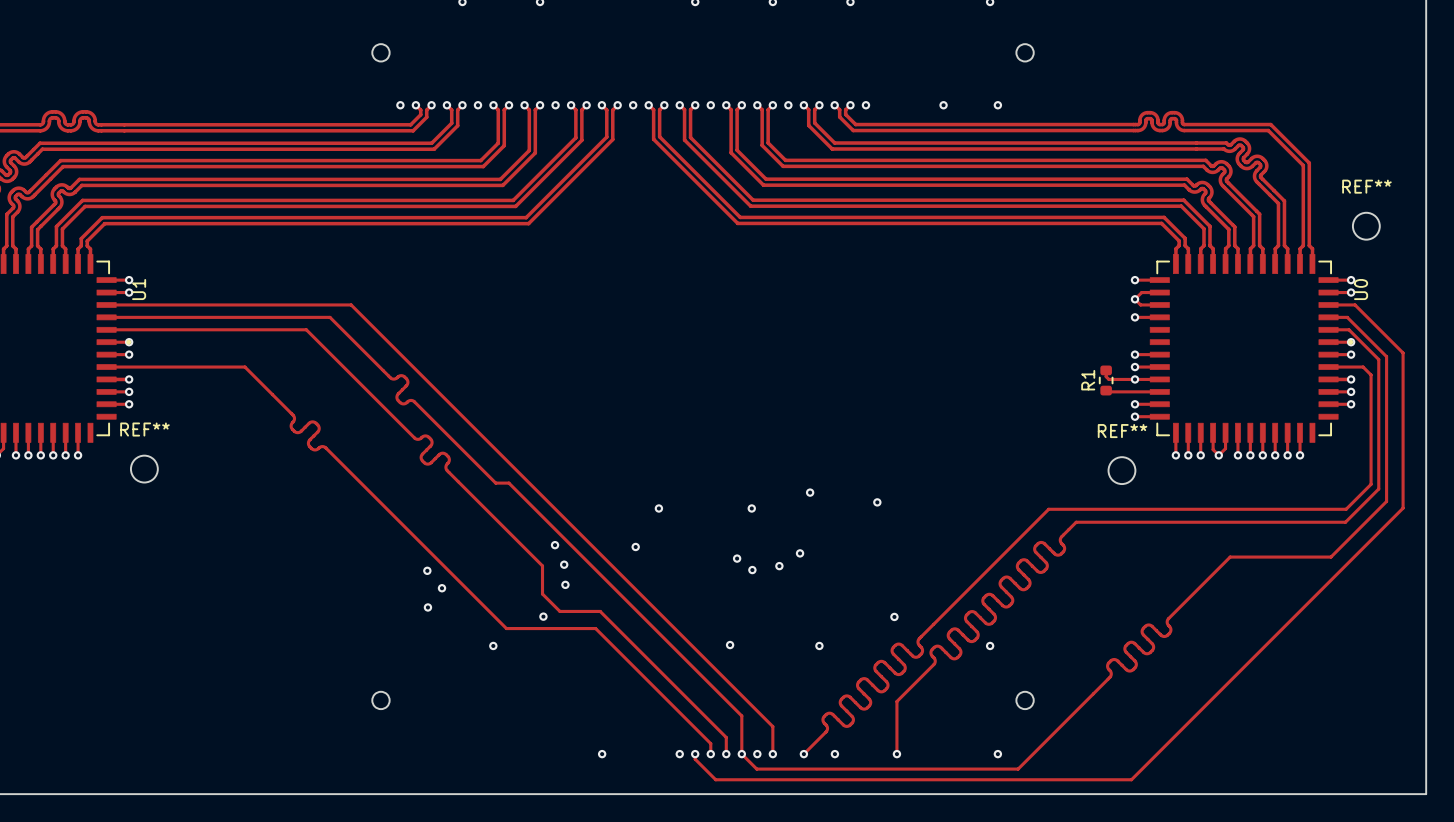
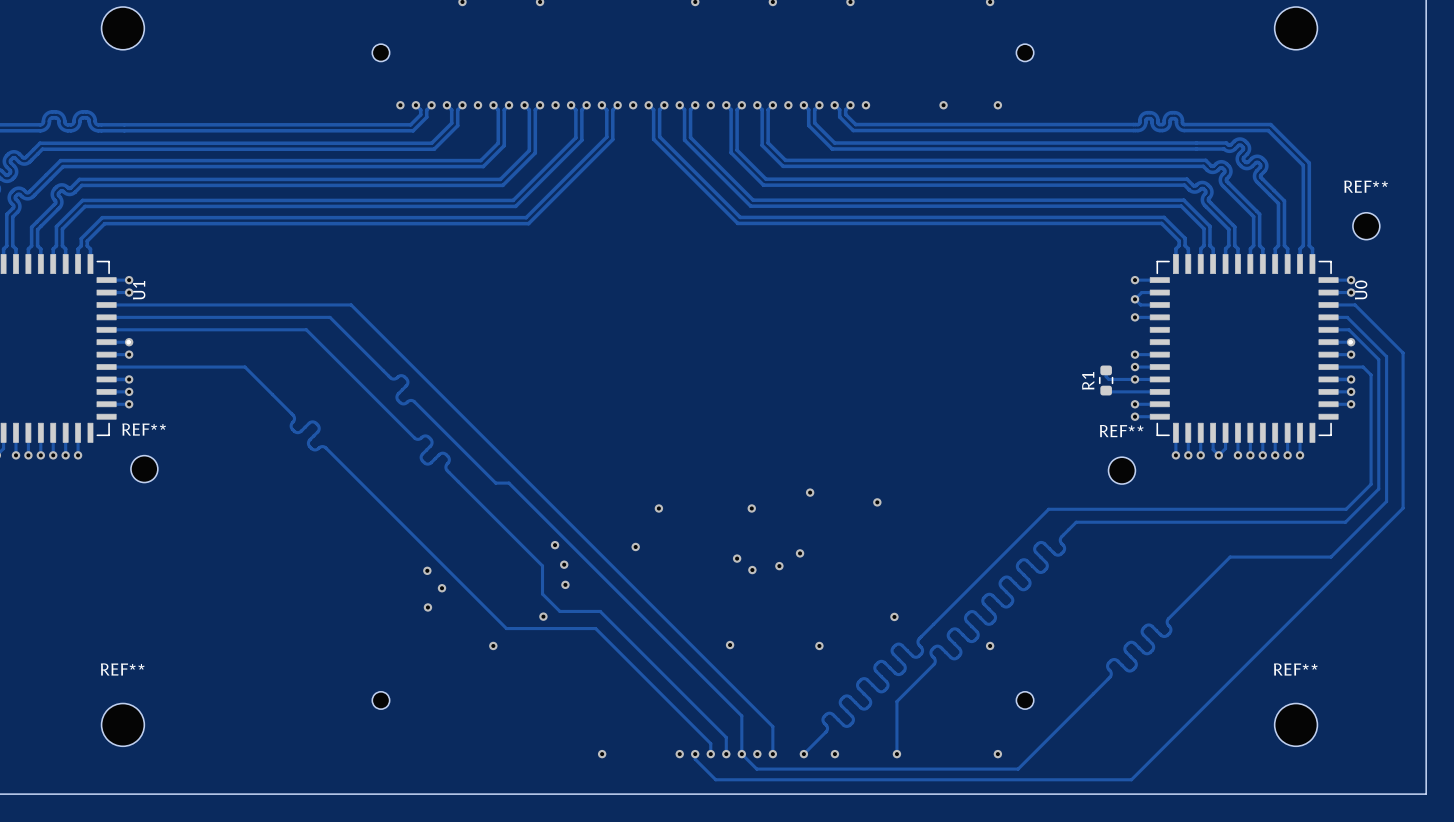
part: none -> (122, 28)
part: none -> (1296, 28)
REF**: none -> (122, 724)
REF**: none -> (1296, 724)

